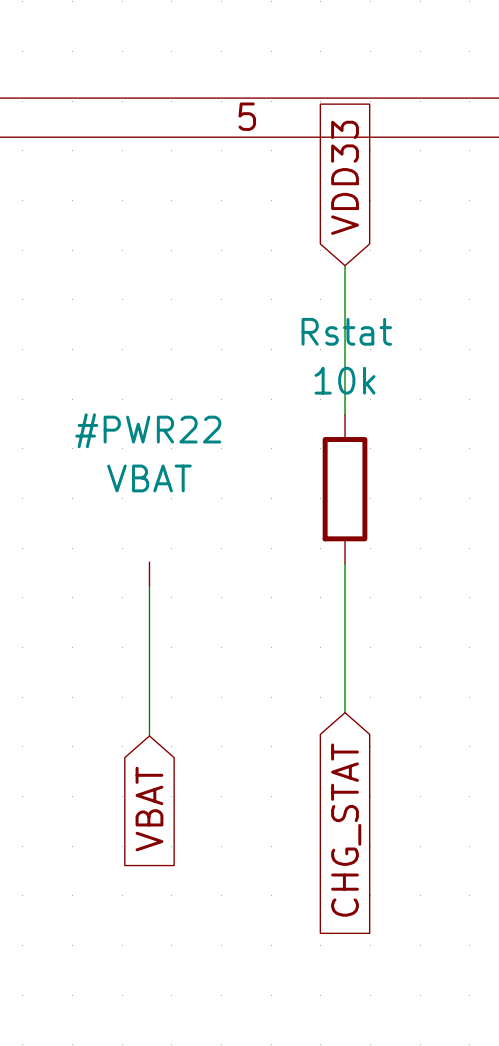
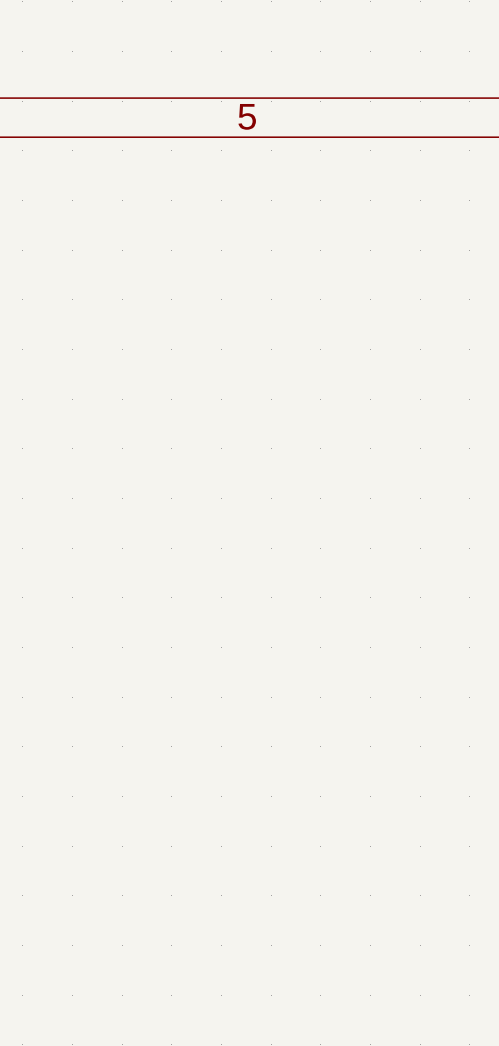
global label: VDD33 (345, 177) -> none
wire: (345, 265) (345, 414) -> none
Rstat: 10k (345, 489) -> none
wire: (345, 563) (345, 712) -> none
#PWR22: VBAT (149, 574) -> none
wire: (149, 586) (149, 735) -> none
global label: VBAT (149, 809) -> none
global label: CHG_STAT (346, 830) -> none

